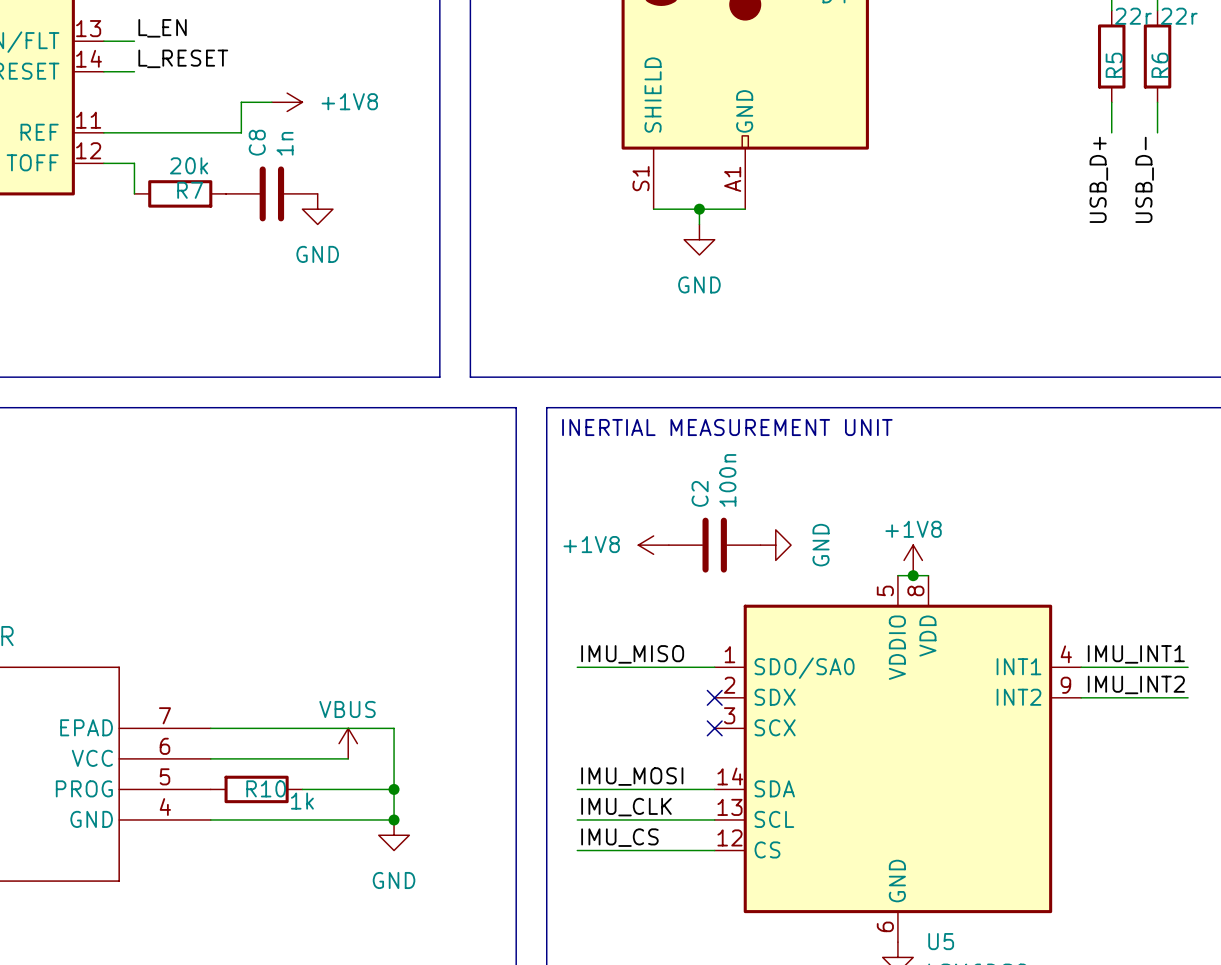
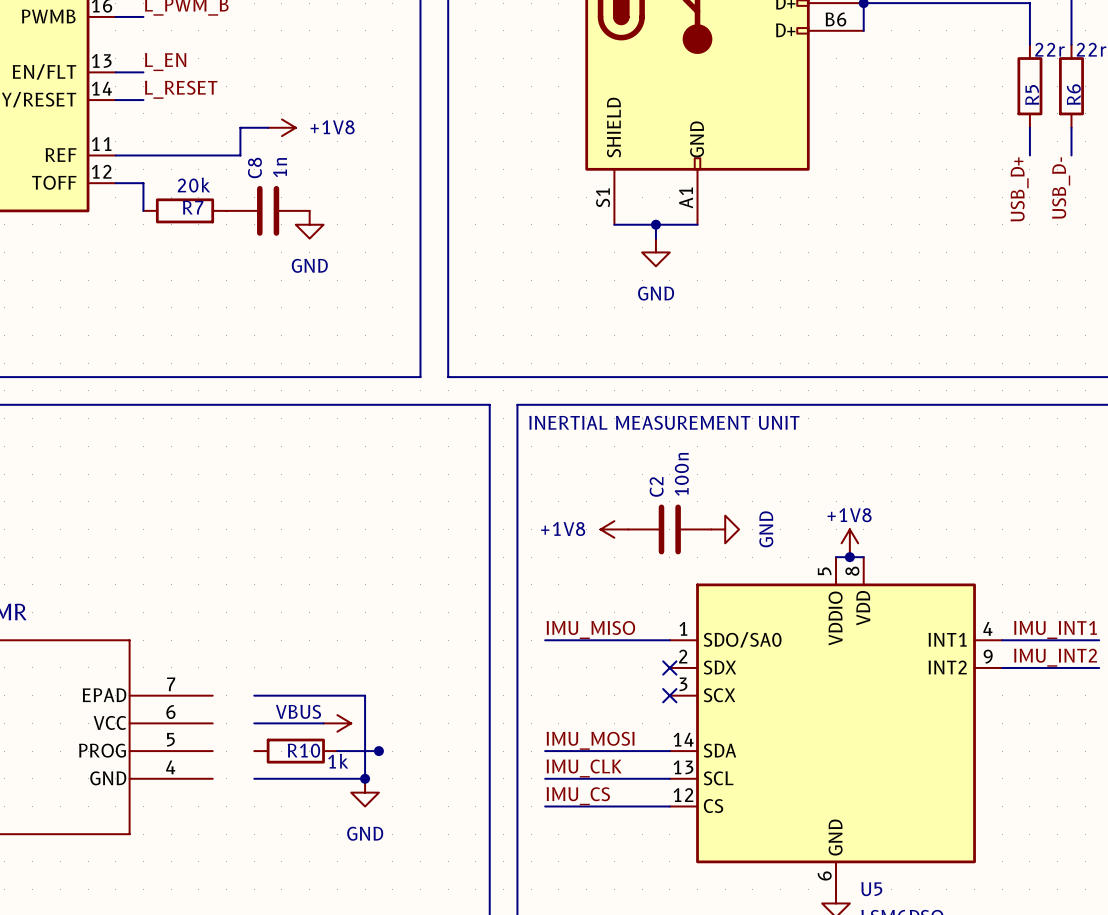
power symbol text position: VBUS (347, 709) -> VBUS (298, 711)
wire: (210, 728) (256, 728) -> none
wire: (378, 728) (394, 728) (394, 819) (378, 819) -> (365, 695) (365, 778)
power symbol rotation: 0° (348, 743) -> 90° clockwise (337, 723)
wire: (210, 758) (256, 758) -> none
R10 position: (256, 789) -> (295, 751)
wire: (302, 789) (348, 789) -> none
wire: (210, 819) (256, 819) -> none
junction position: (394, 819) -> (365, 778)
power symbol position: GND (394, 835) -> GND (365, 792)

